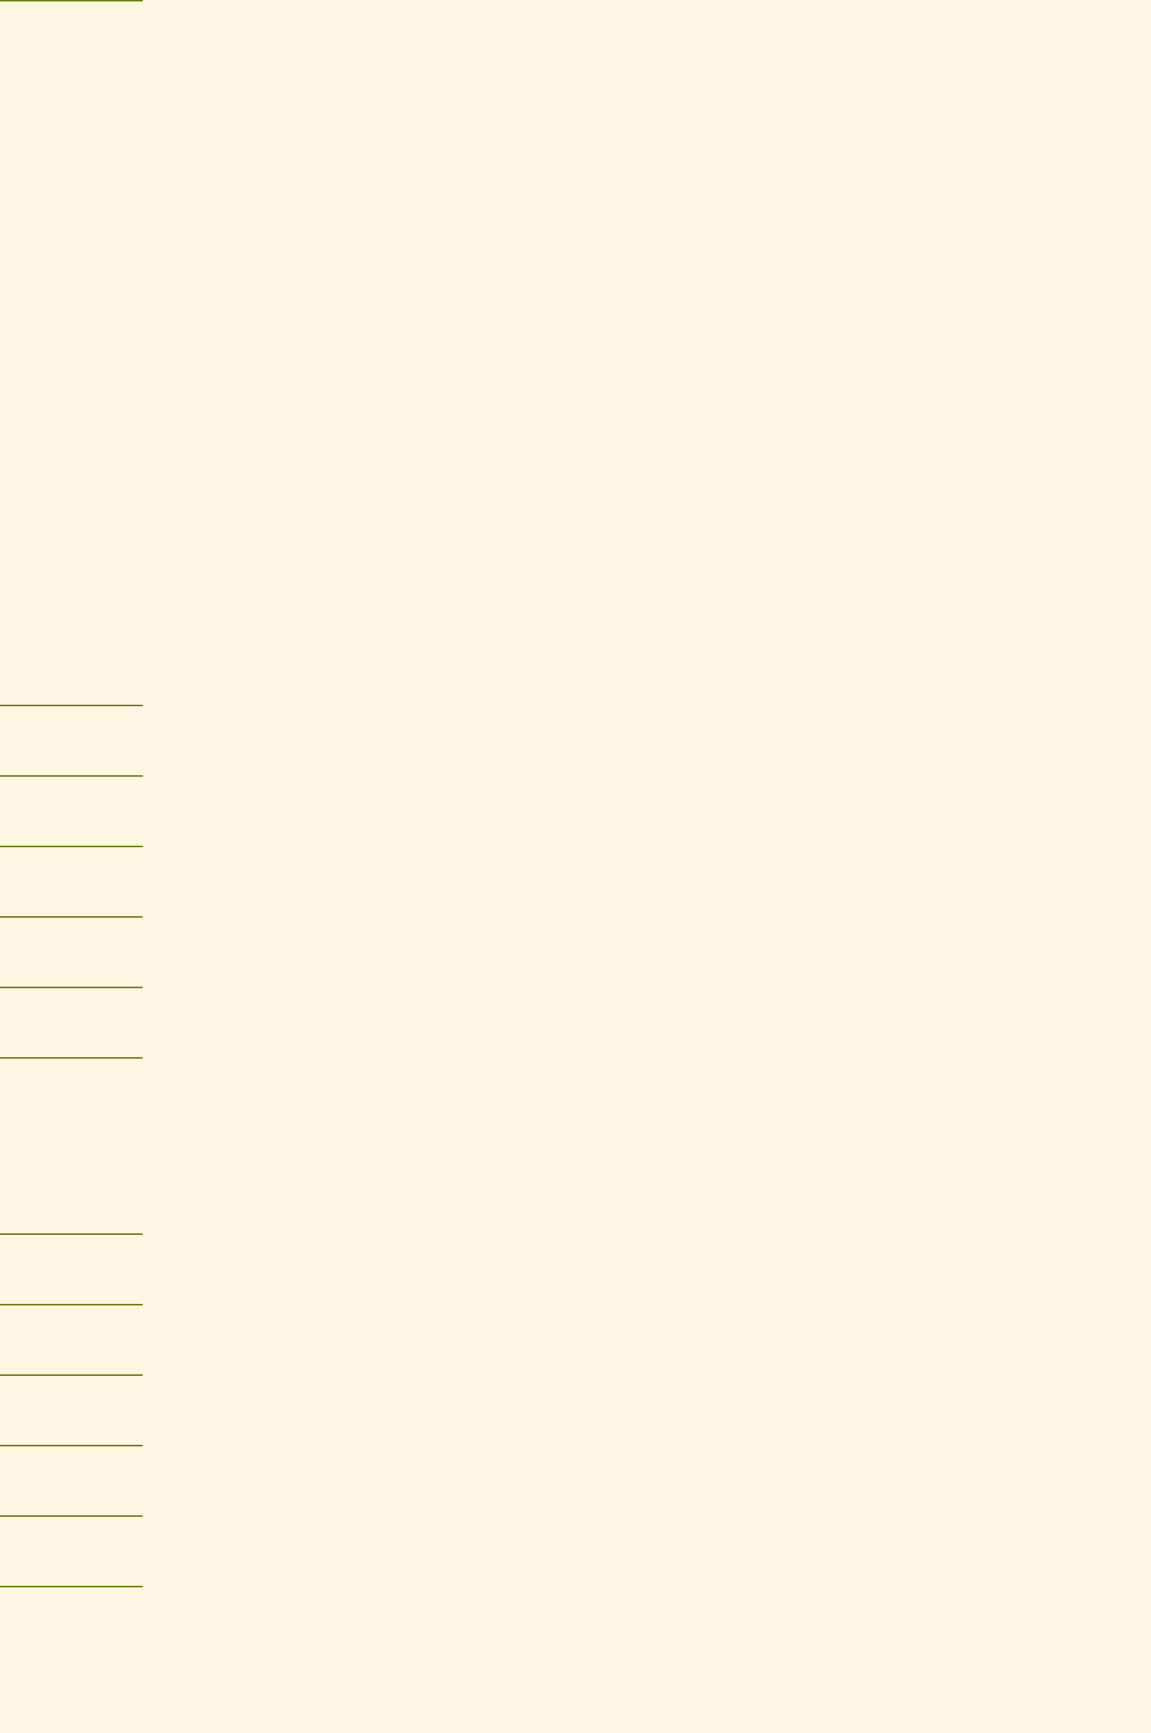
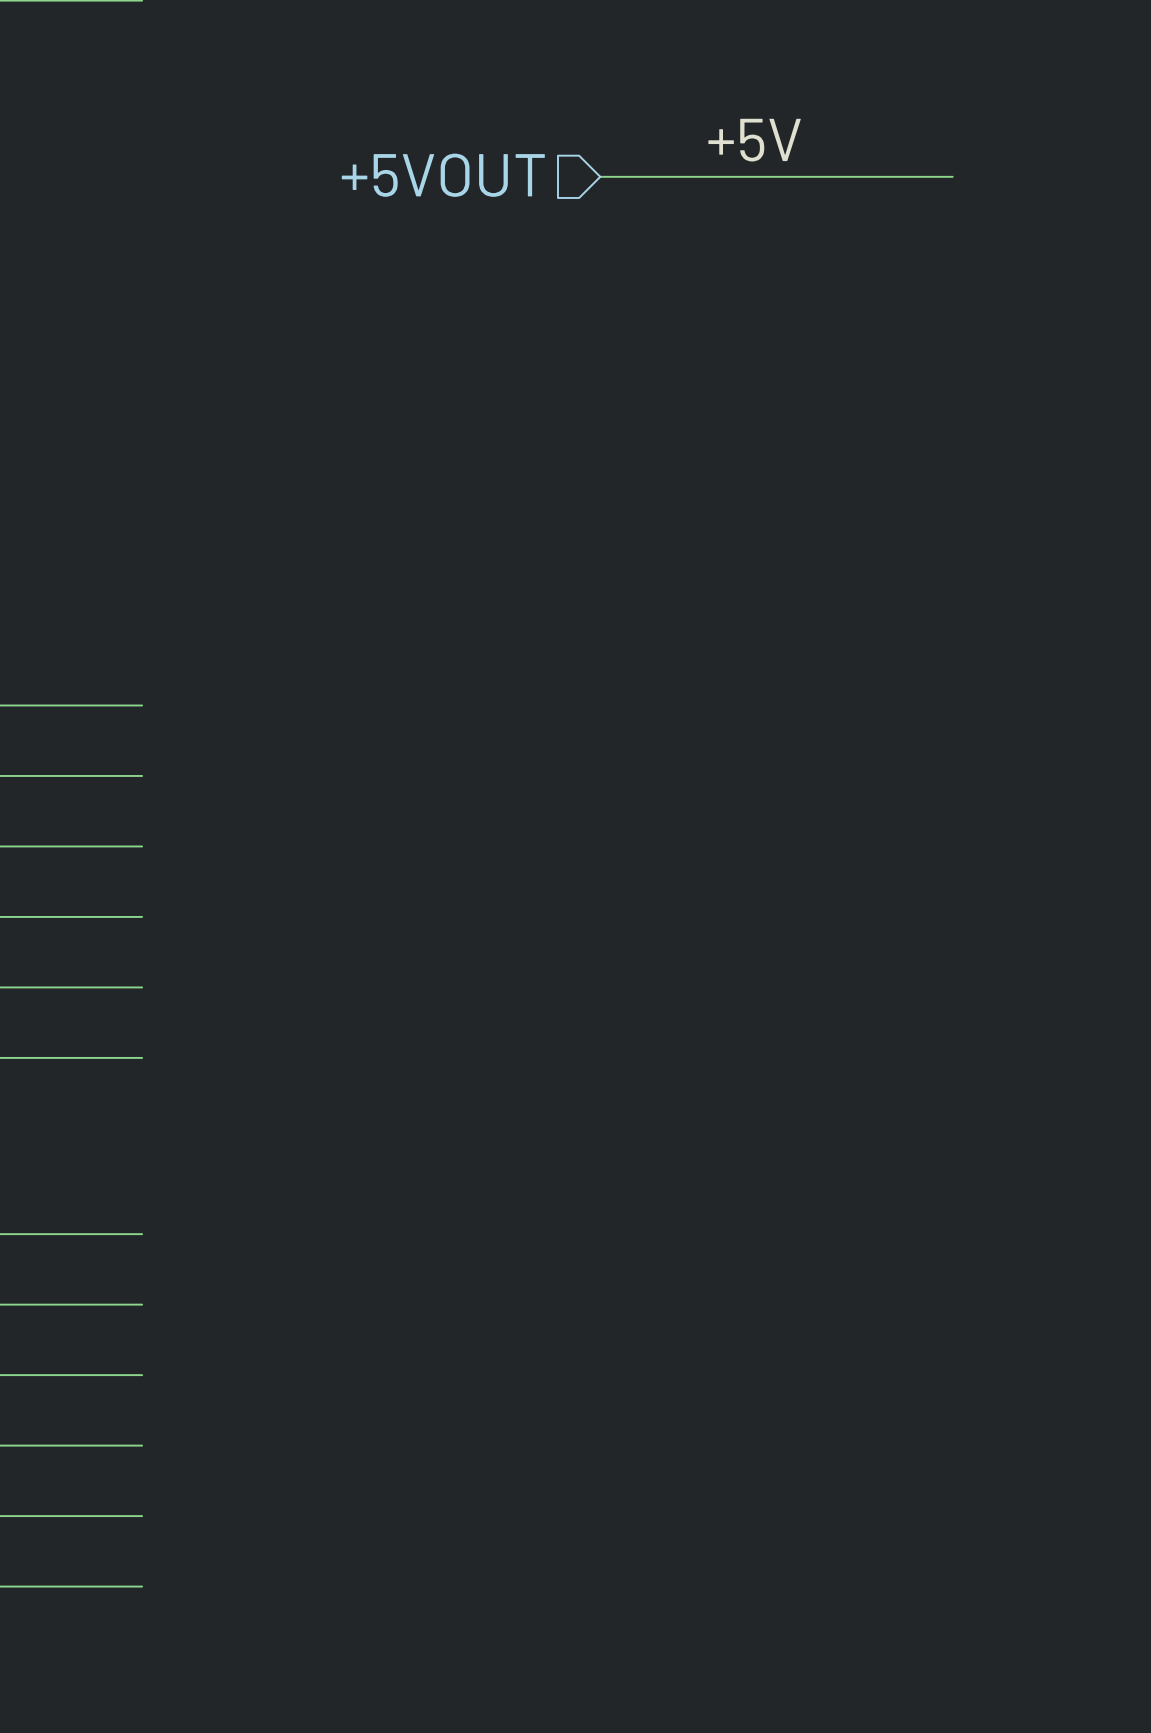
label: none -> +5V (754, 140)
sheet pin: none -> +5VOUT (443, 175)
wire: none -> (600, 176) (952, 176)

